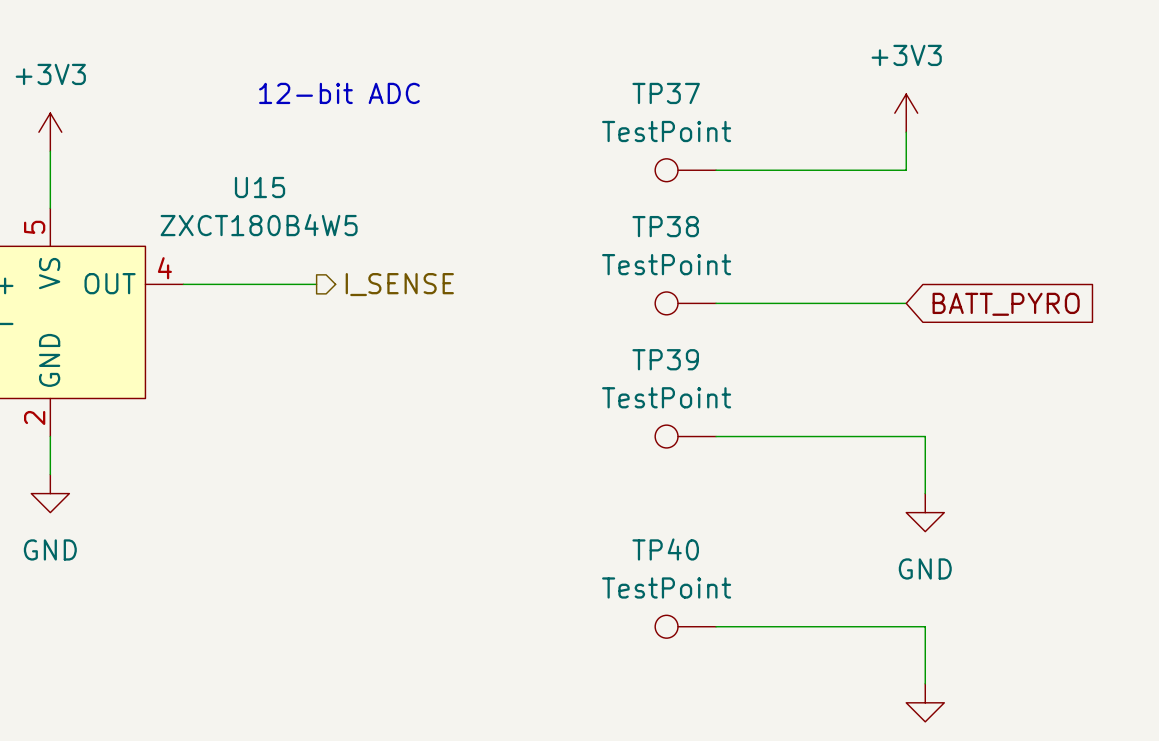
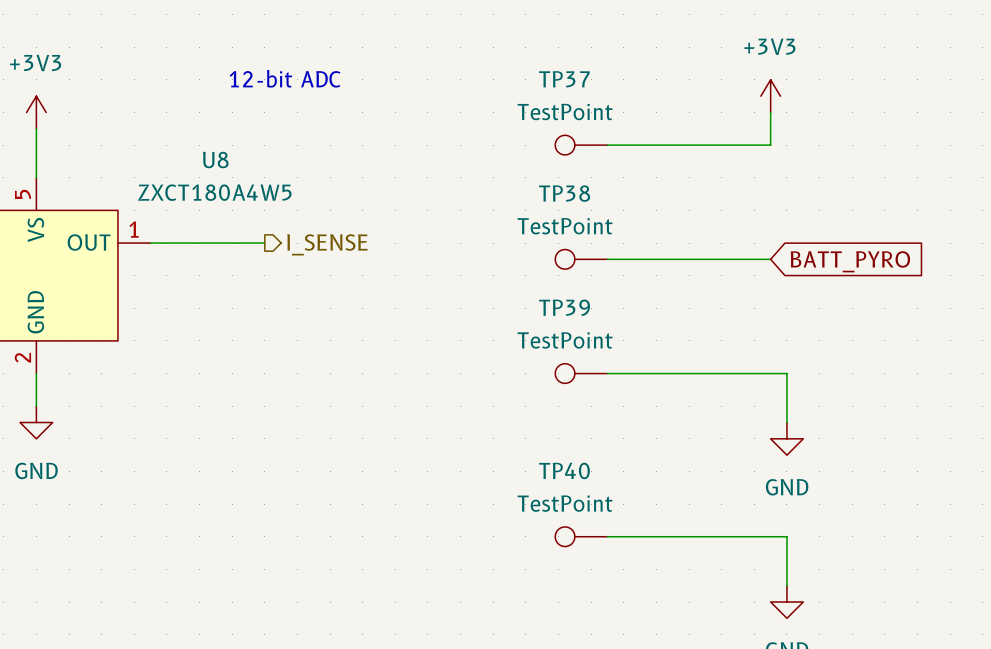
U15 name: U15 (260, 187) -> U8 (215, 160)
U15 value: ZXCT180B4W5 (259, 225) -> ZXCT180A4W5 (214, 192)
U15 pin number: 4 (164, 268) -> 1 (133, 229)

